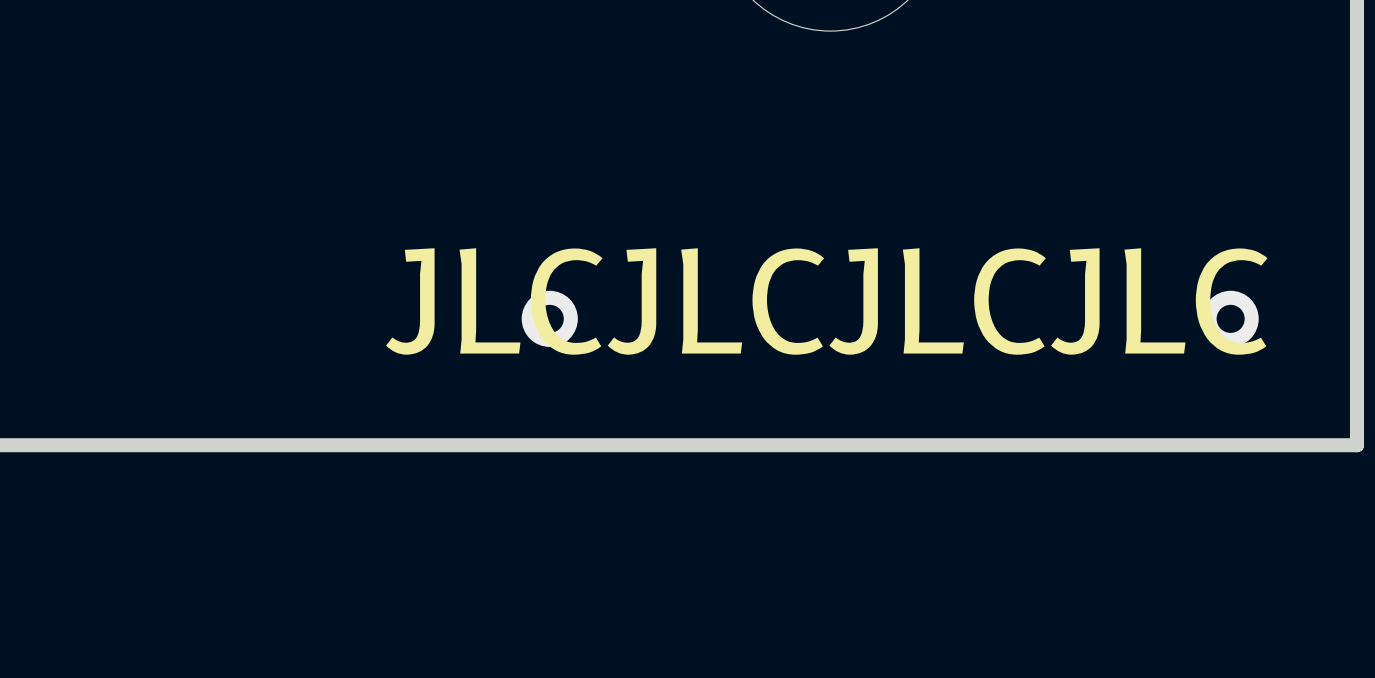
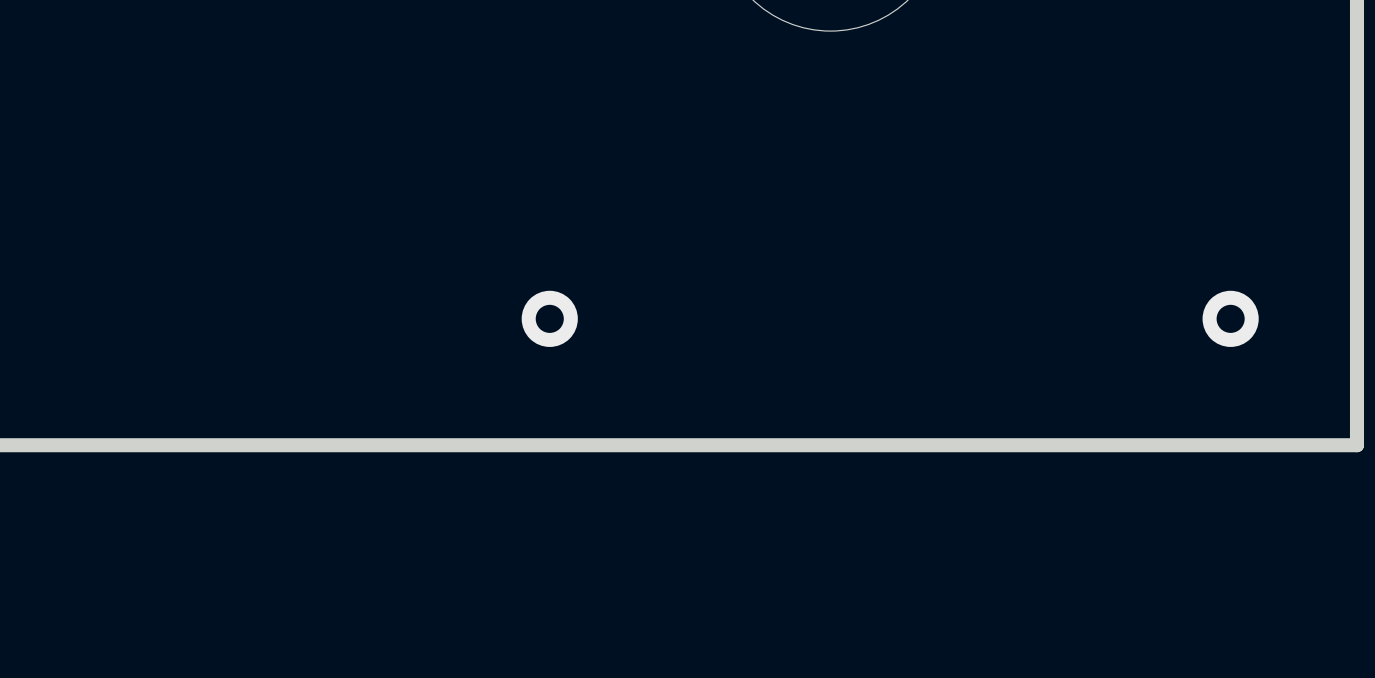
text: JLCJLCJLCJLC (826, 301) -> none

